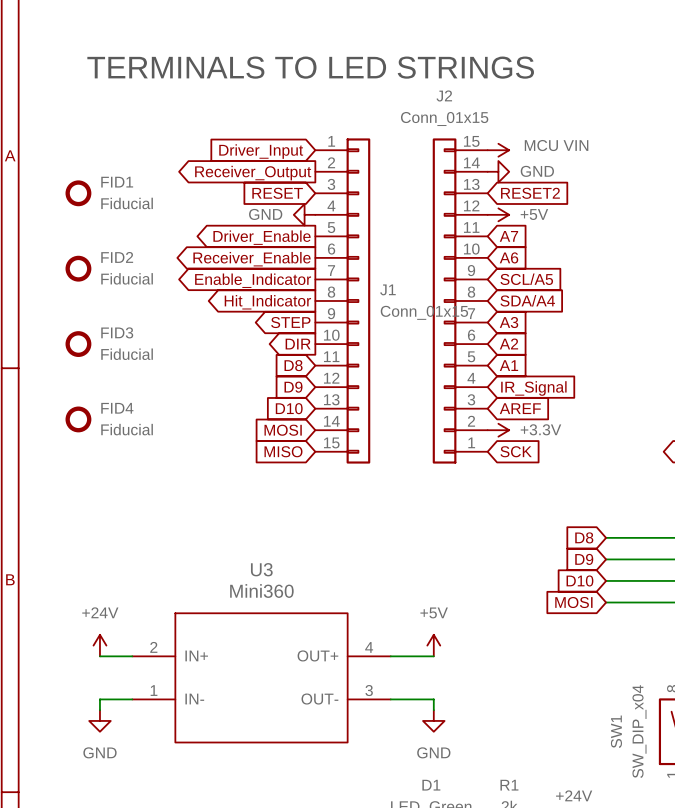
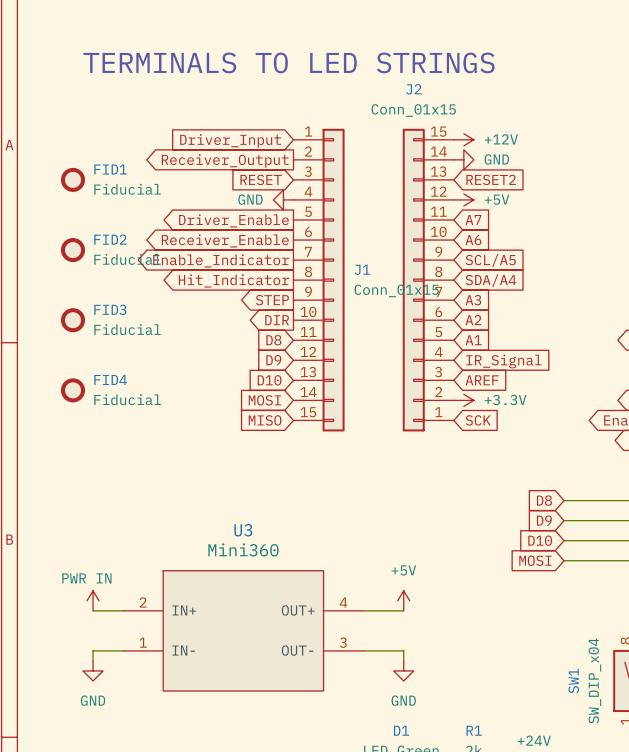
power symbol: MCU VIN (498, 150) -> +12V (463, 139)
power symbol: +24V (99, 645) -> PWR IN (93, 600)

